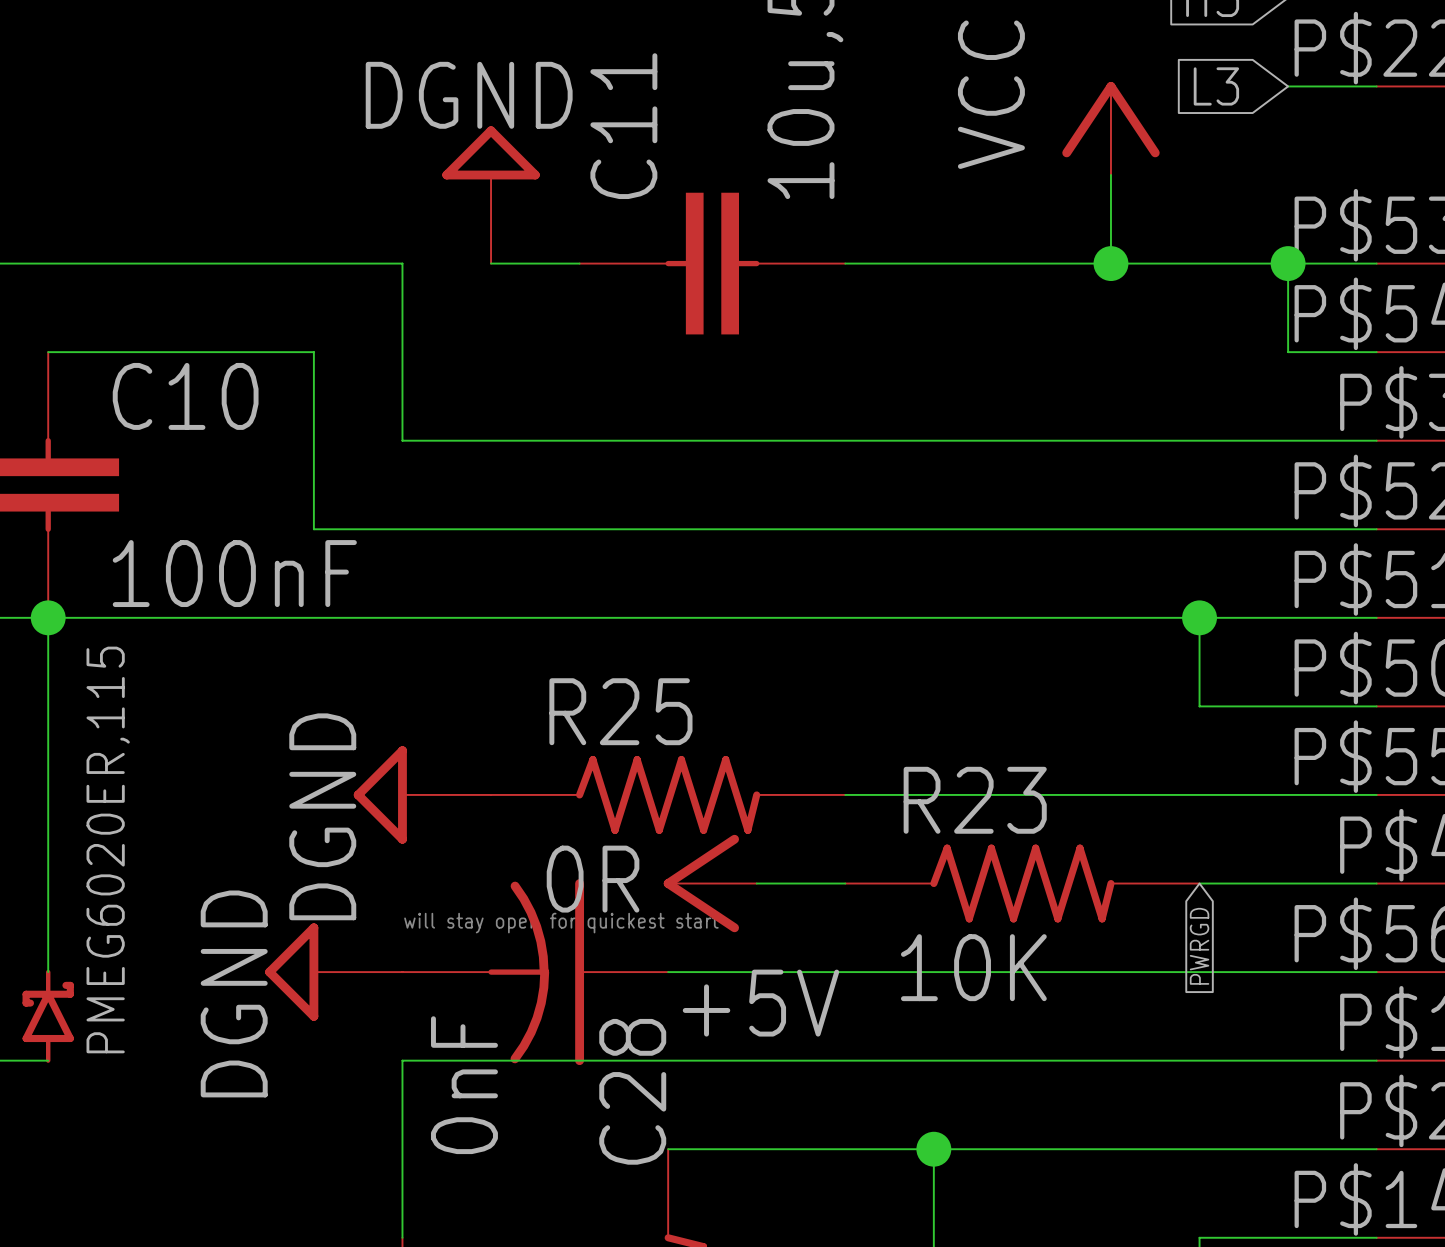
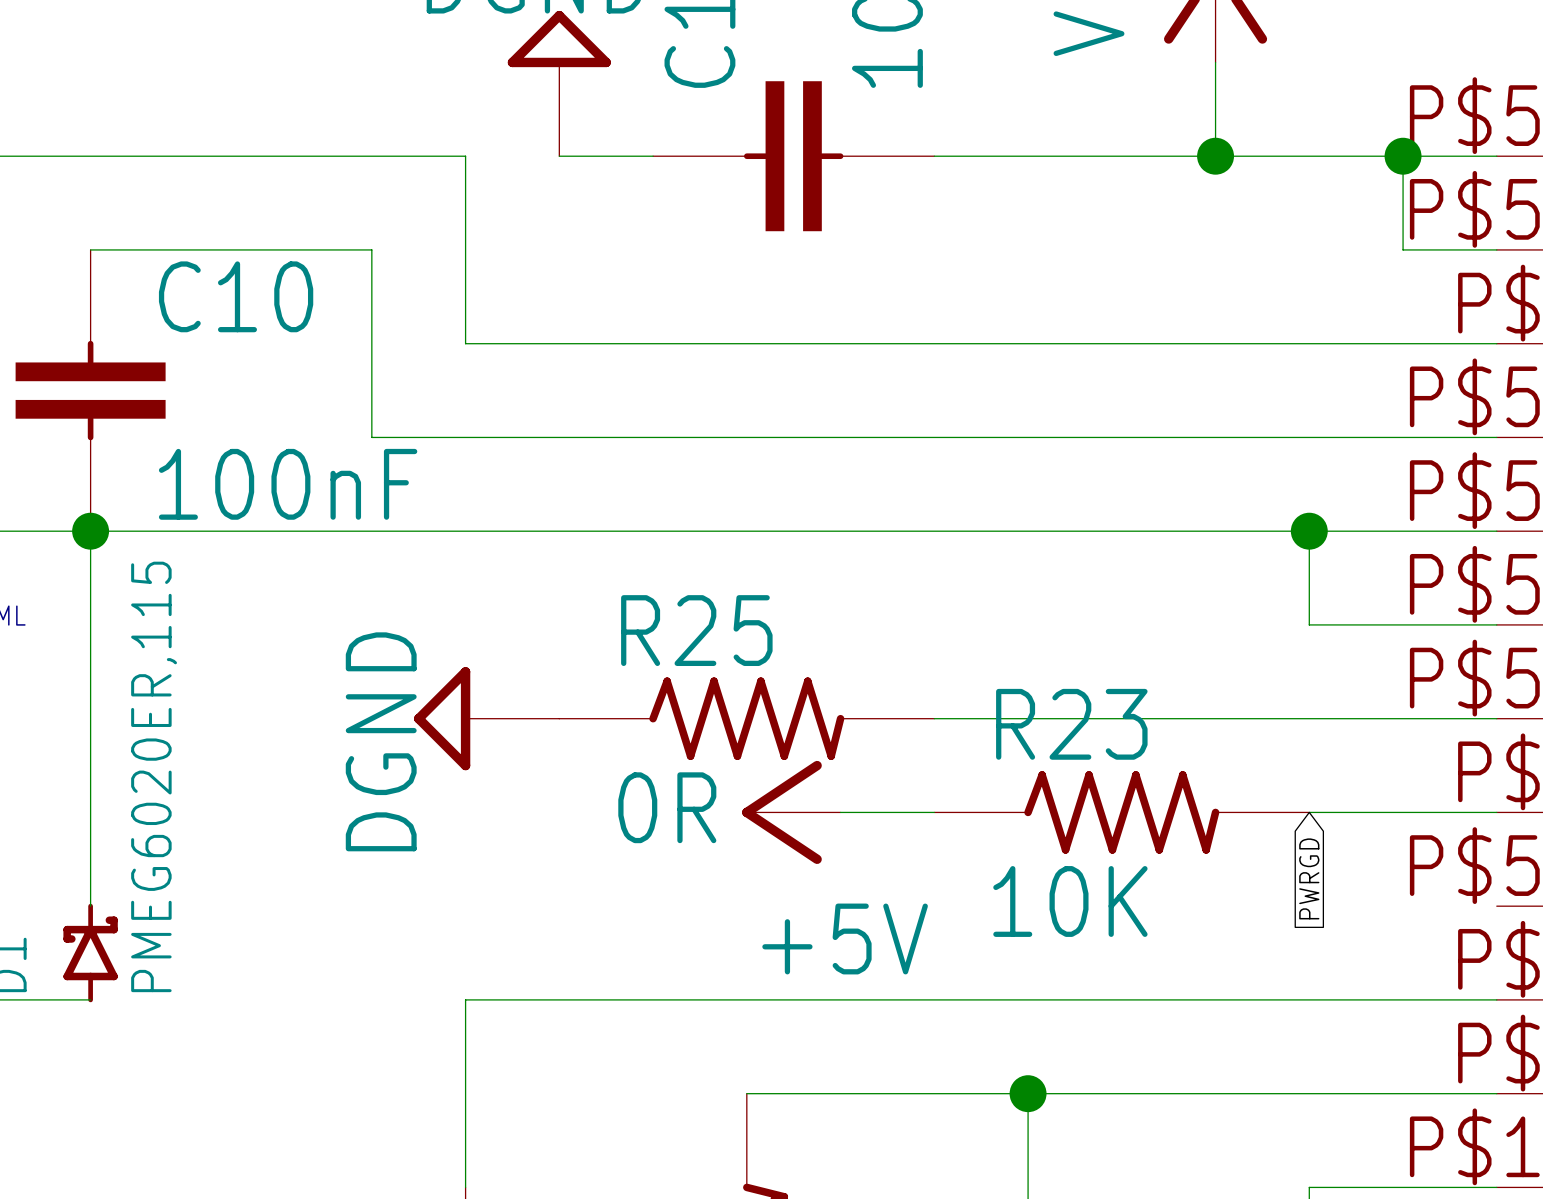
text: will stay open for quickest start (561, 923) -> none
power symbol: DGND (333, 972) -> none
C28: 0nF (535, 972) -> none
wire: (668, 972) (1376, 972) -> none

